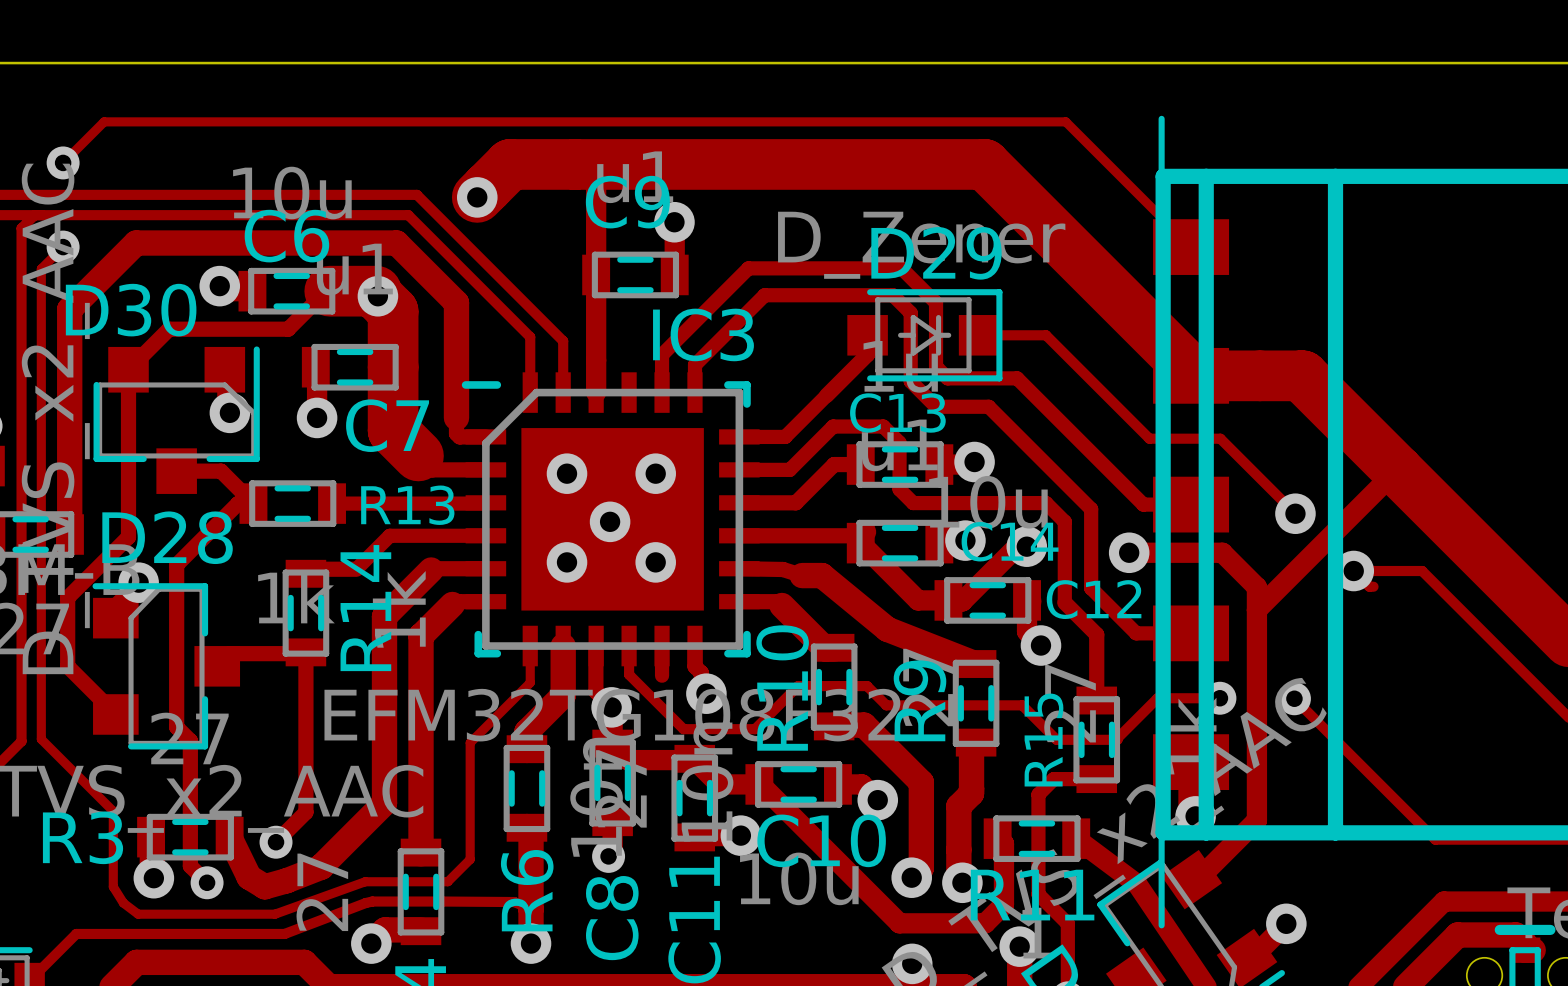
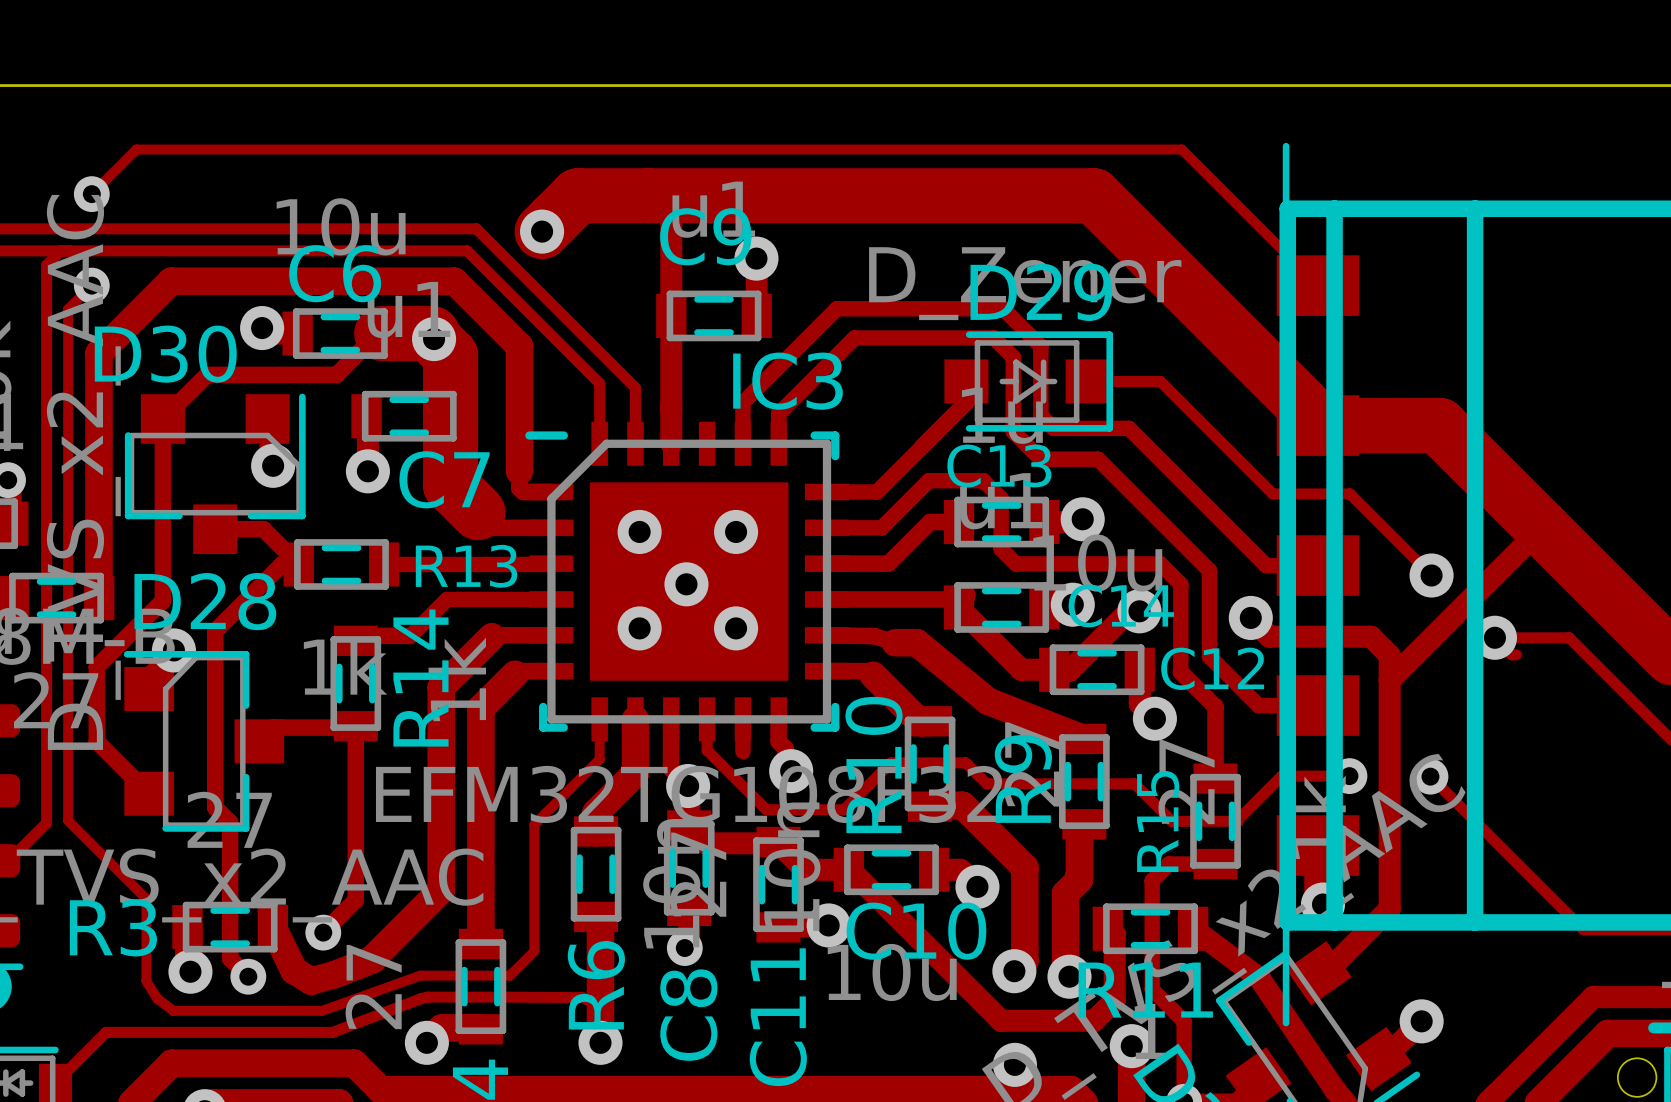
track: (1129, 552) (1222, 552) (1239, 569) -> (1250, 617) (1269, 636) (1370, 636)

